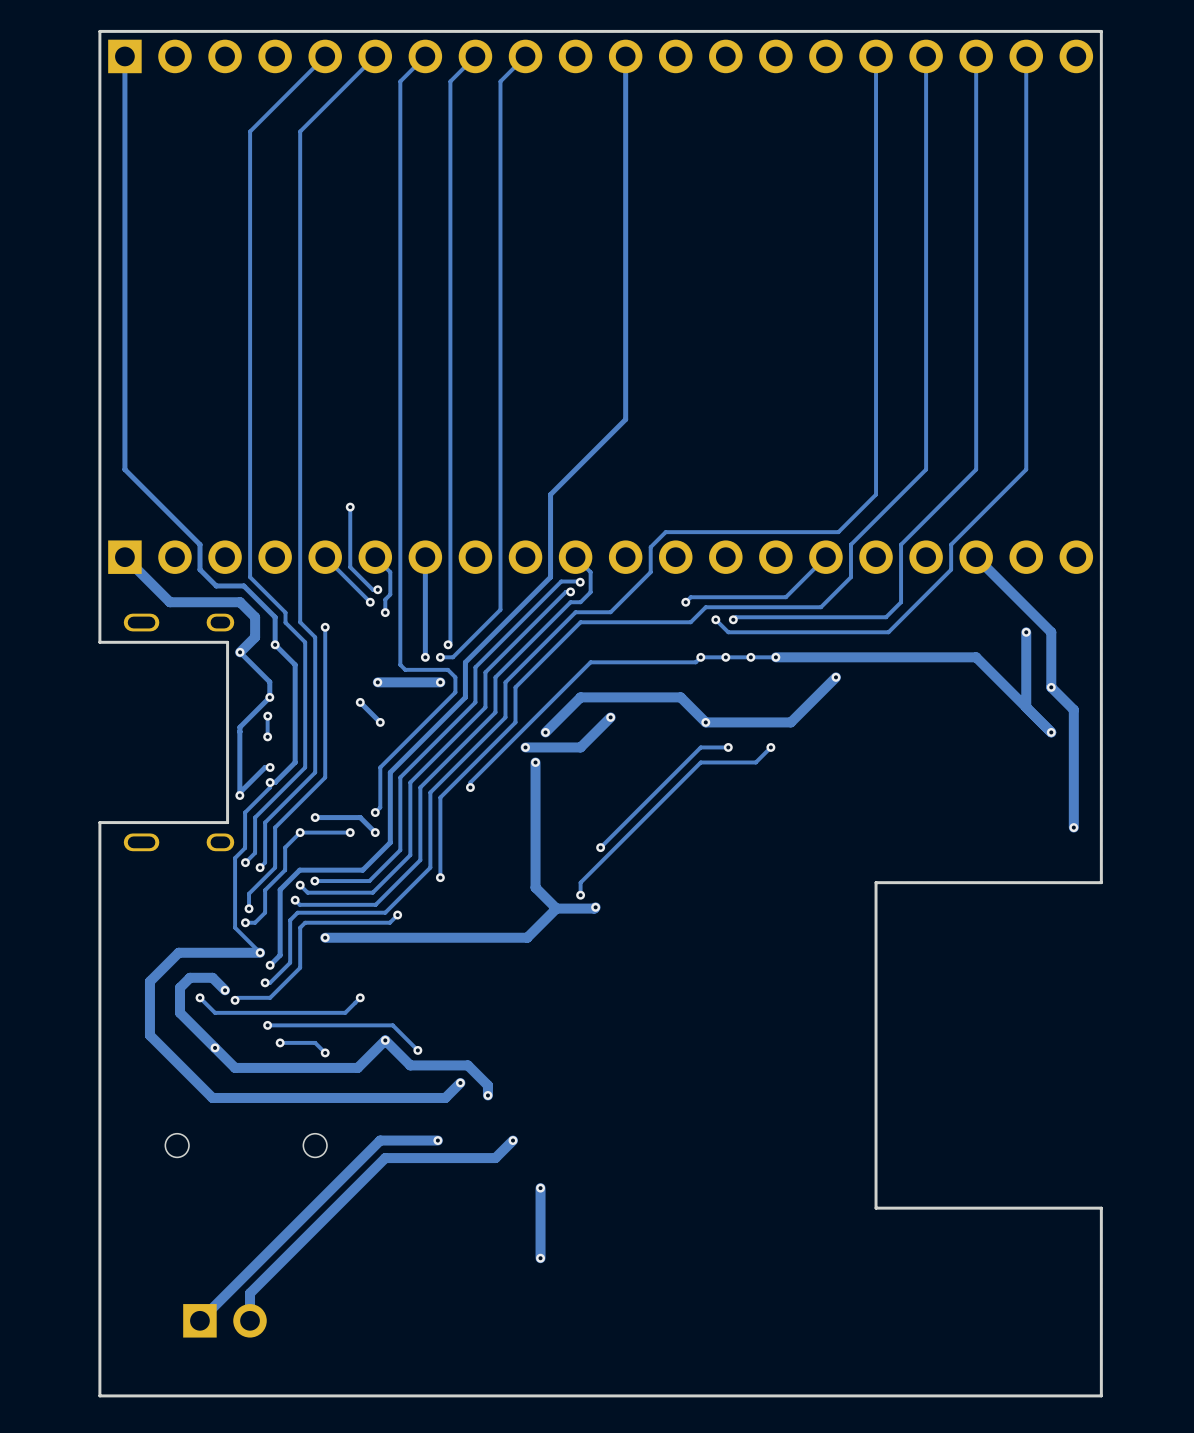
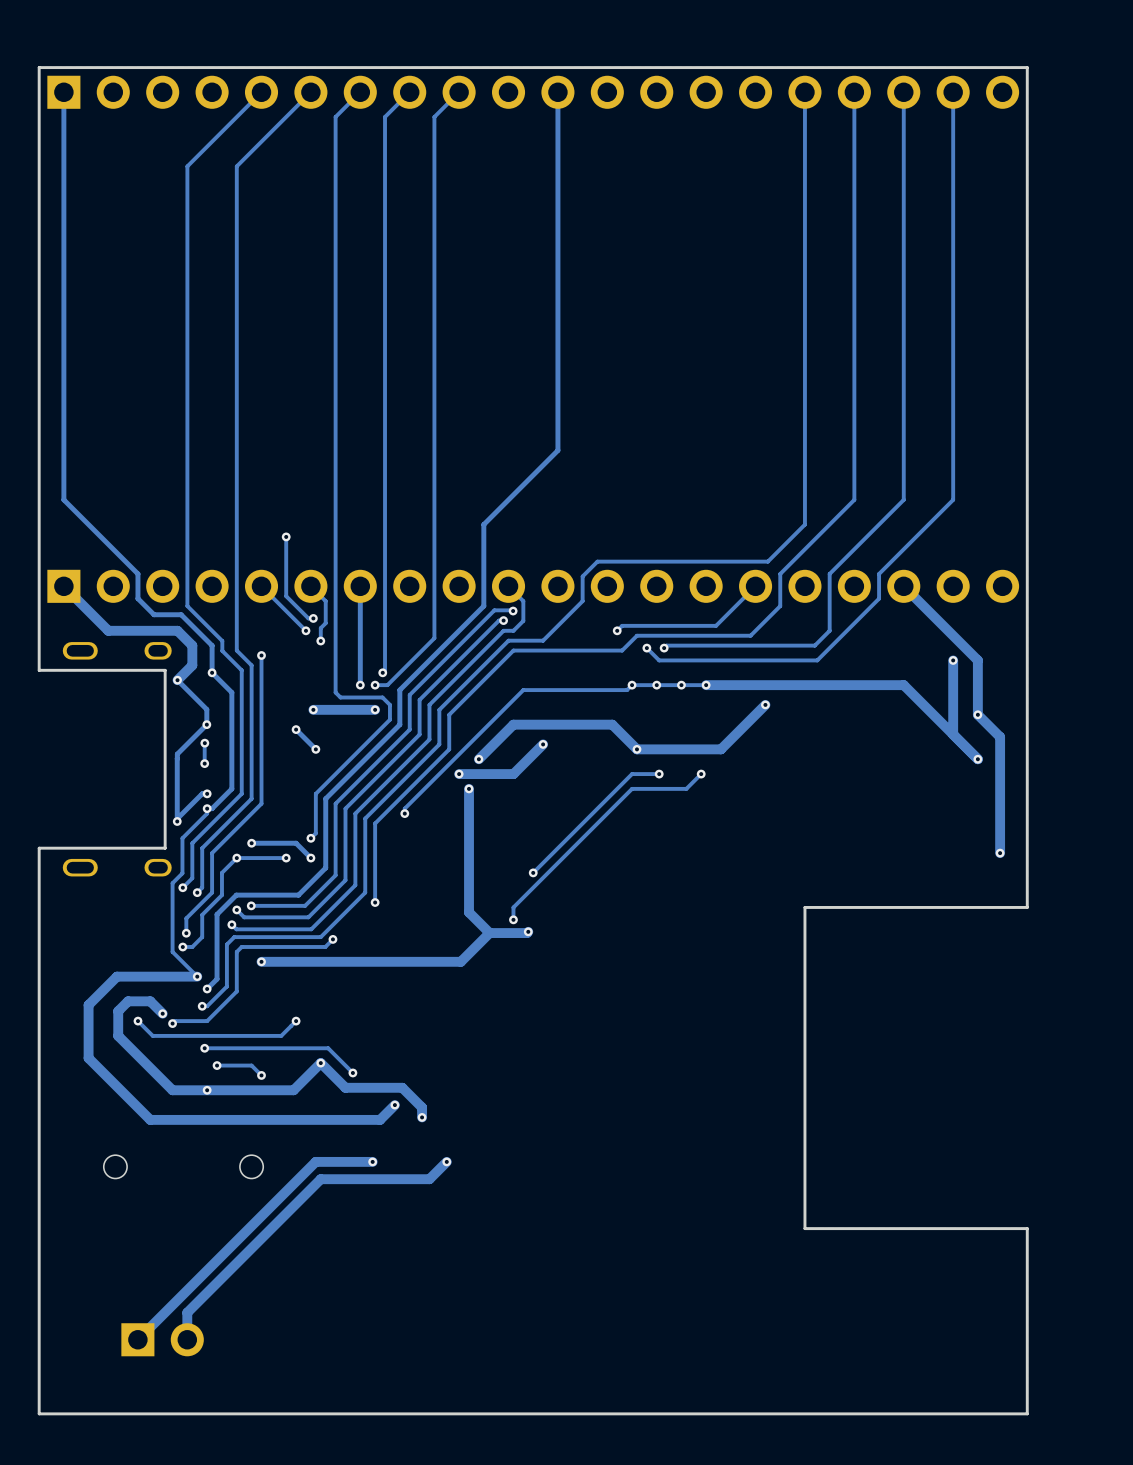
via position: (215, 1047) -> (207, 1090)
track: (540, 1188) (540, 1258) -> none
via: (540, 1188) -> none
via: (540, 1258) -> none

